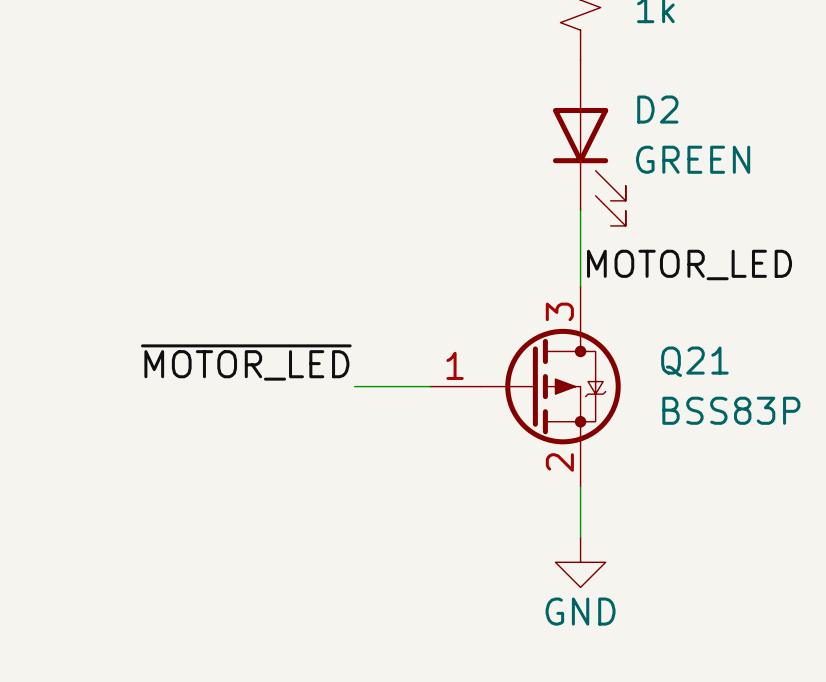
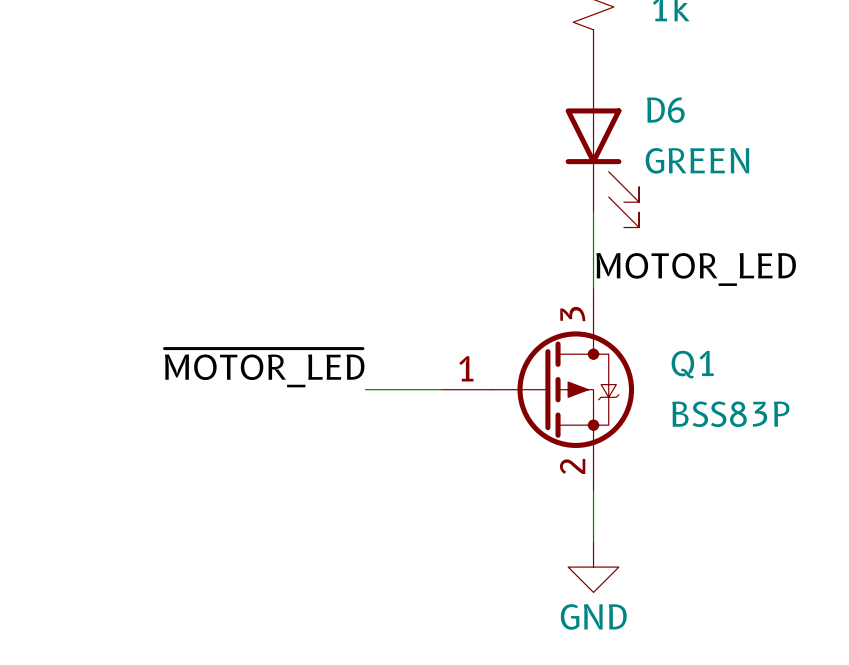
D2 name: D2 (657, 109) -> D6 (665, 110)
Q21 name: Q21 (694, 361) -> Q1 (692, 364)

